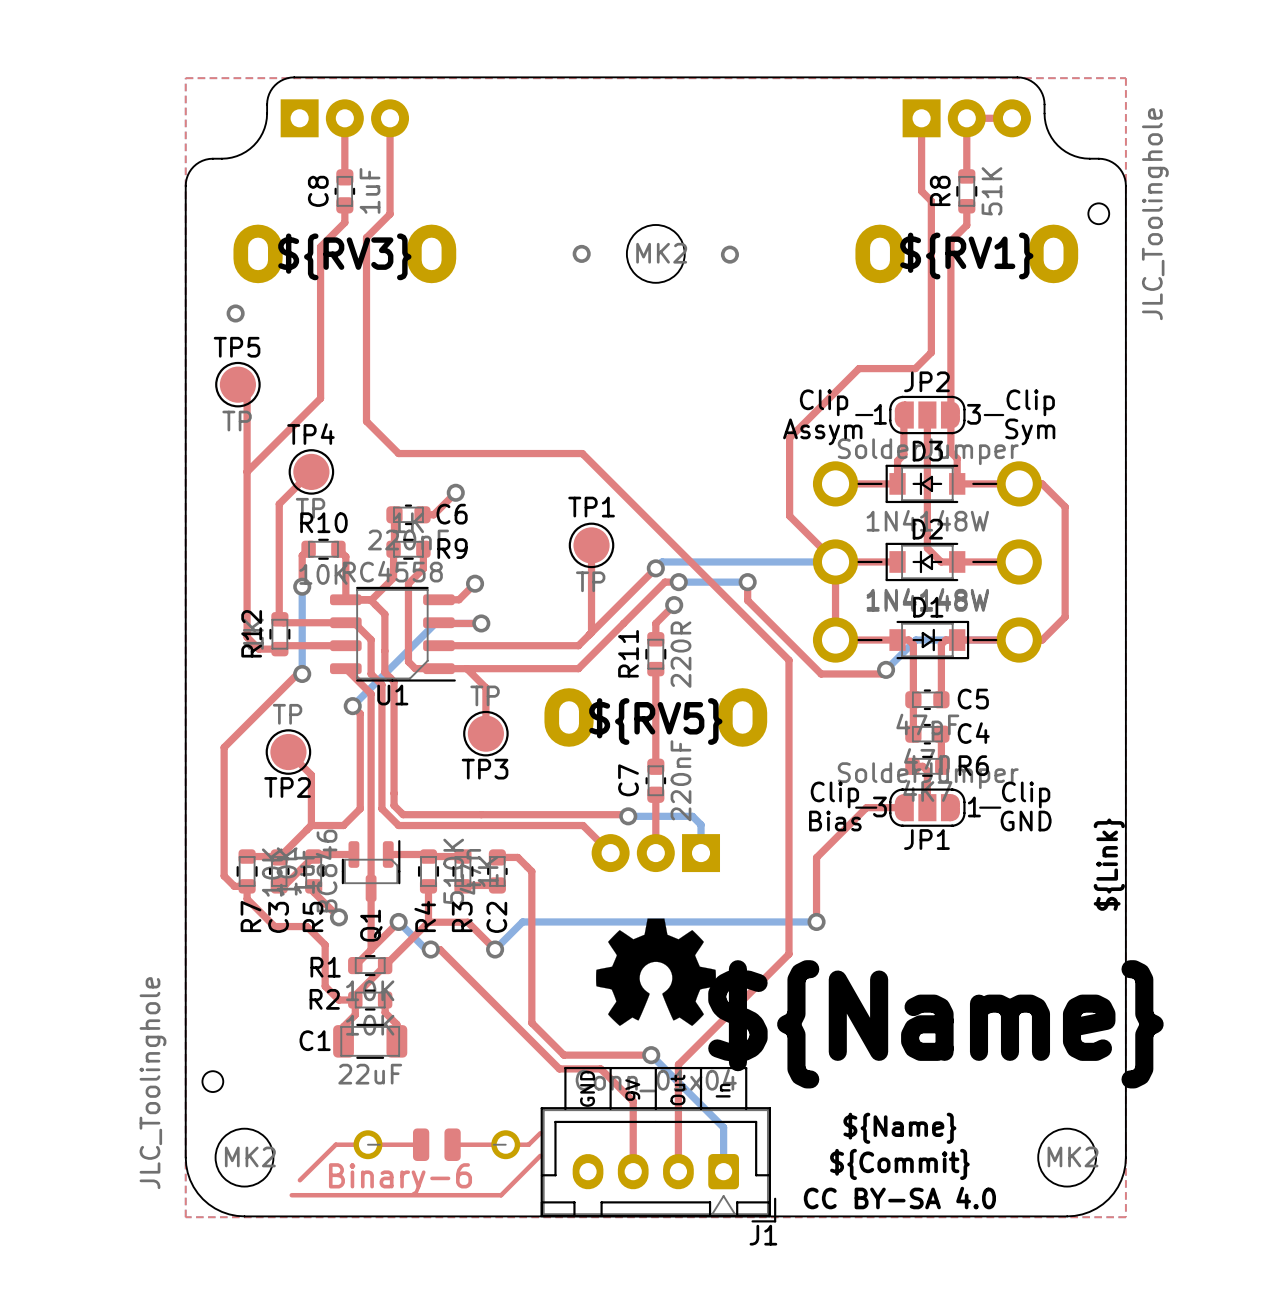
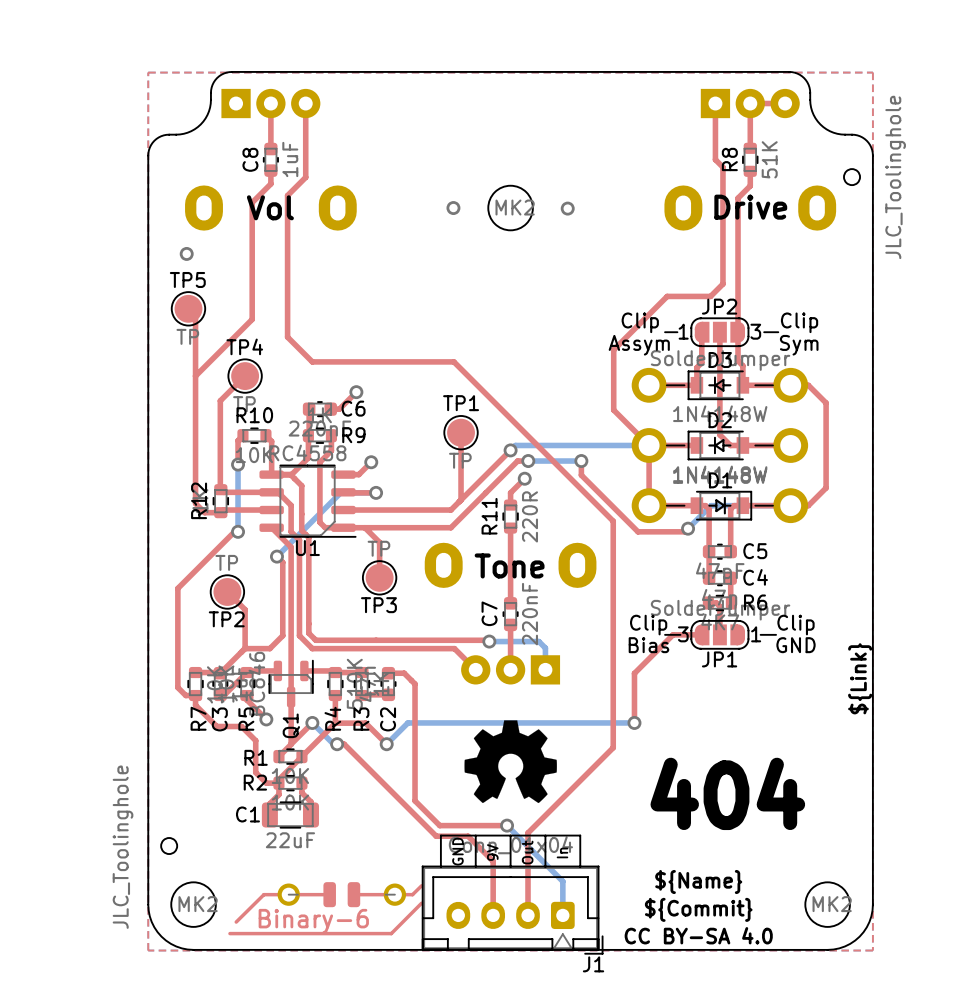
text: ${RV1} (966, 255) -> Drive (750, 207)
text: ${RV3} (344, 256) -> Vol (270, 207)
text: ${RV5} (655, 721) -> Tone (509, 565)
text: ${Name} (935, 1024) -> 404 (727, 793)

